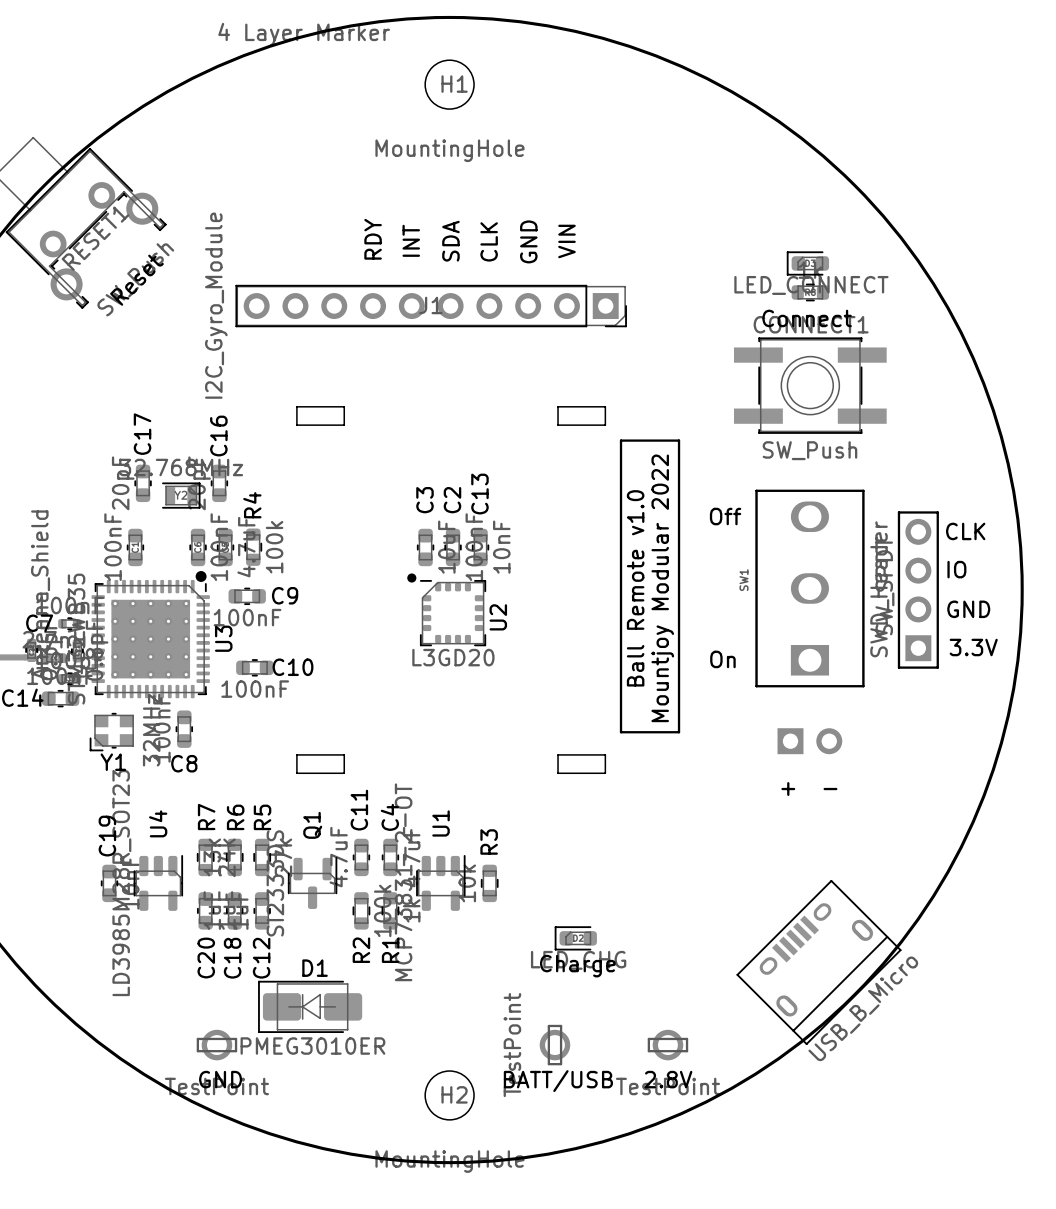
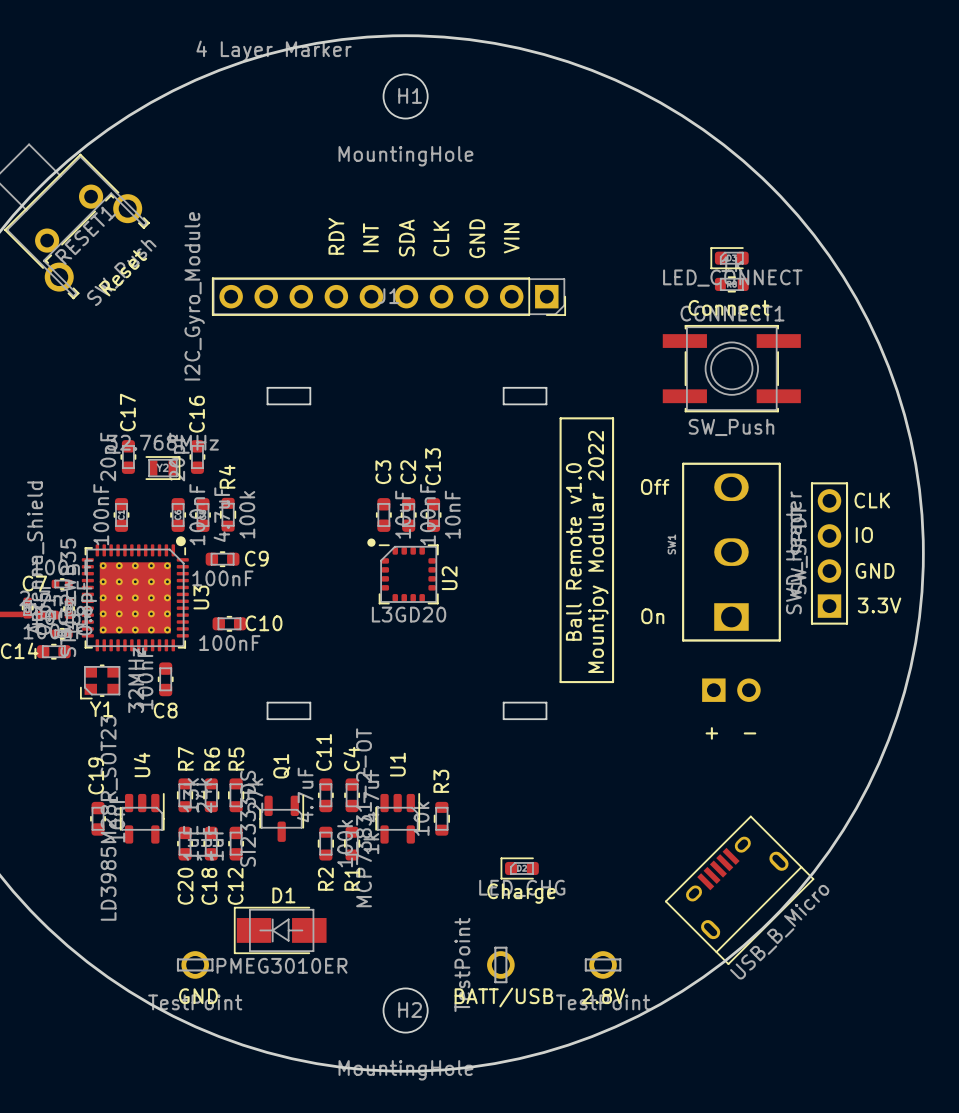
D1 footprint: [258, 980, 363, 1033] -> [233, 906, 327, 955]

